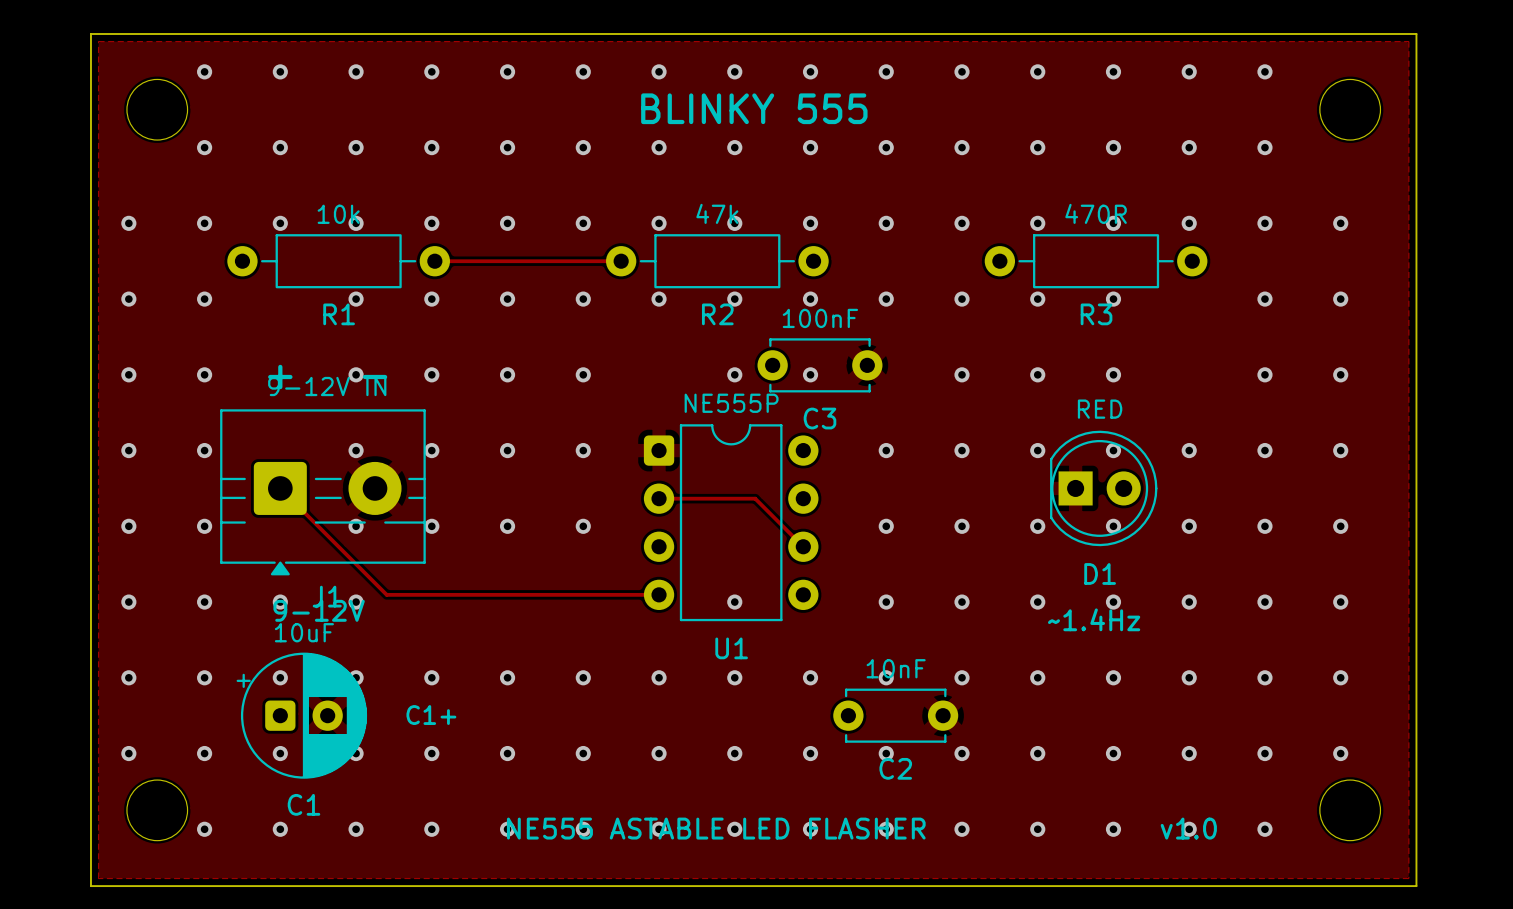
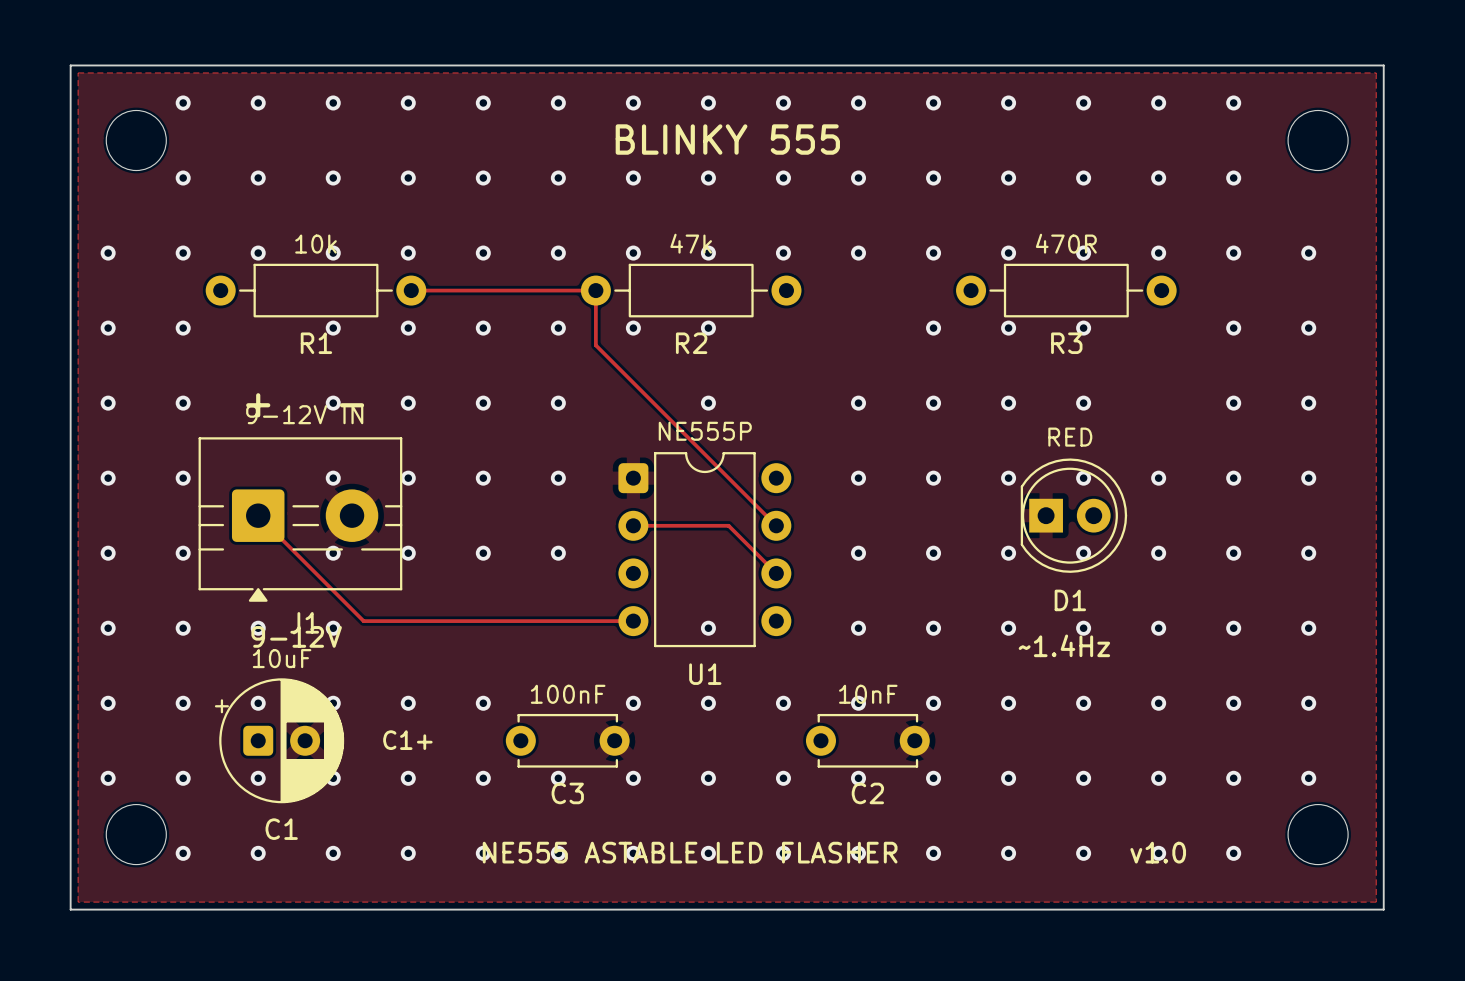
track: none -> (595, 290) (595, 345) (776, 525)
via: (810, 299) -> none
via: (886, 299) -> none
C3 position: (819, 365) -> (567, 740)
via: (810, 374) -> none
via: none -> (858, 403)
via: (583, 677) -> none

